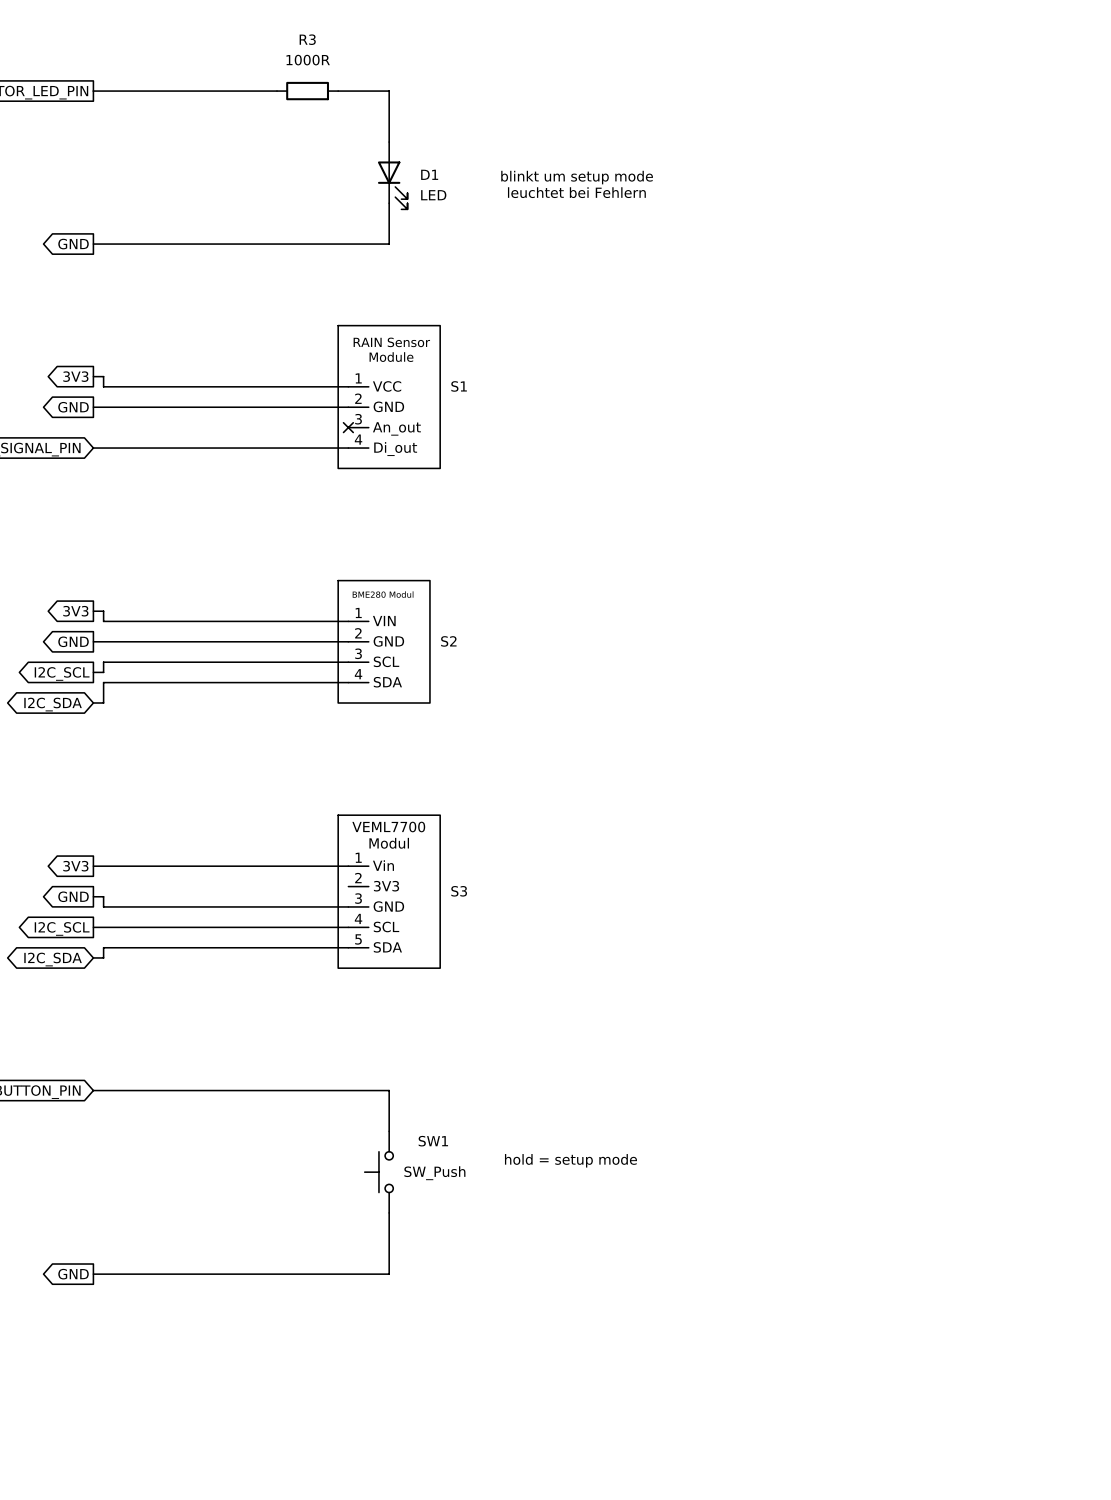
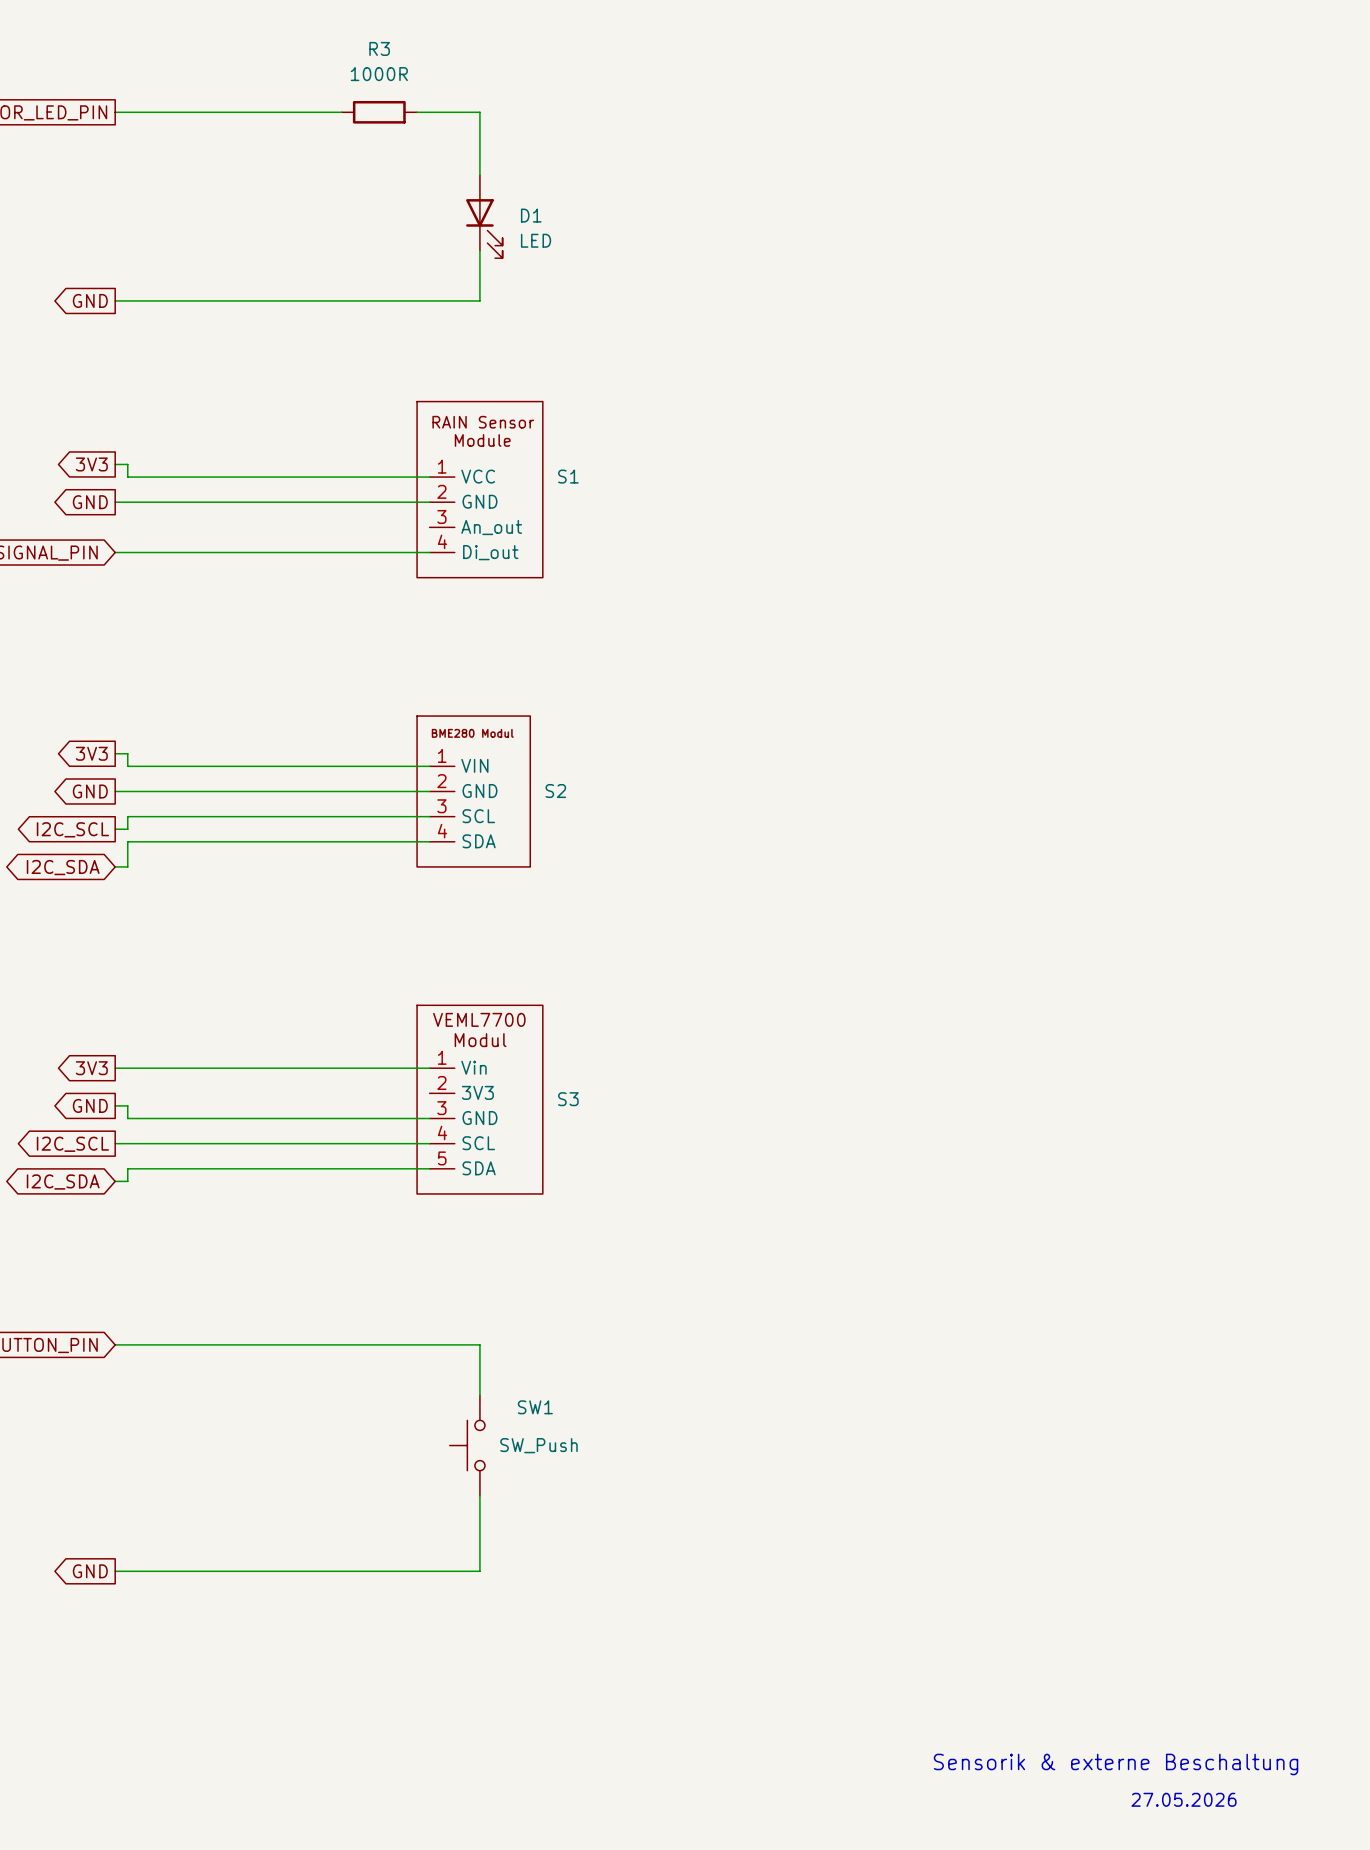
text: blinkt um setup mode (577, 177) -> none
text: leuchtet bei Fehlern (576, 192) -> none
no-connect mark: (348, 427) -> none
text: hold = setup mode (570, 1160) -> none
text: none -> Sensorik & externe Beschaltung (1116, 1764)
text: none -> 27.05.2026 (1183, 1799)

